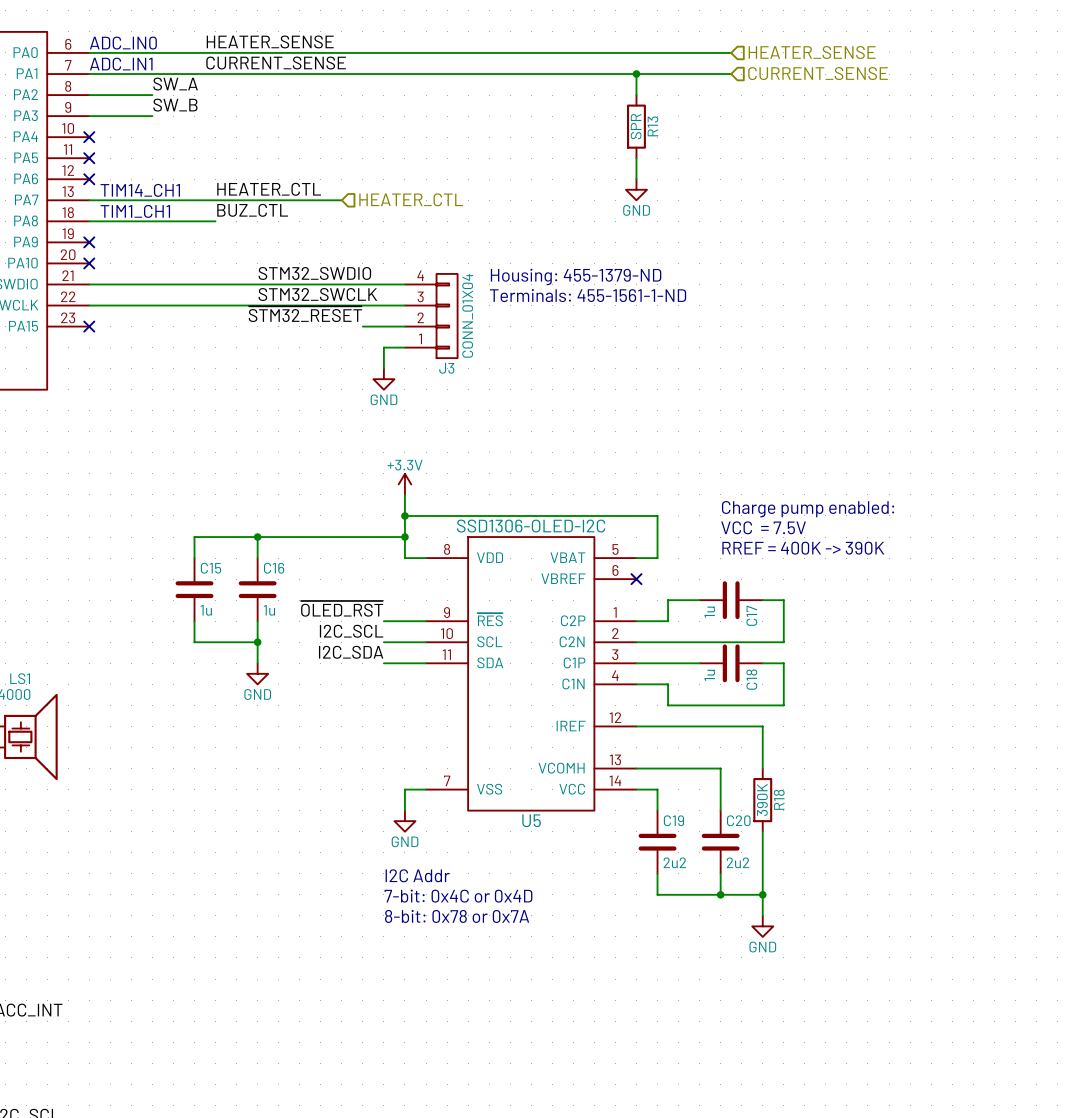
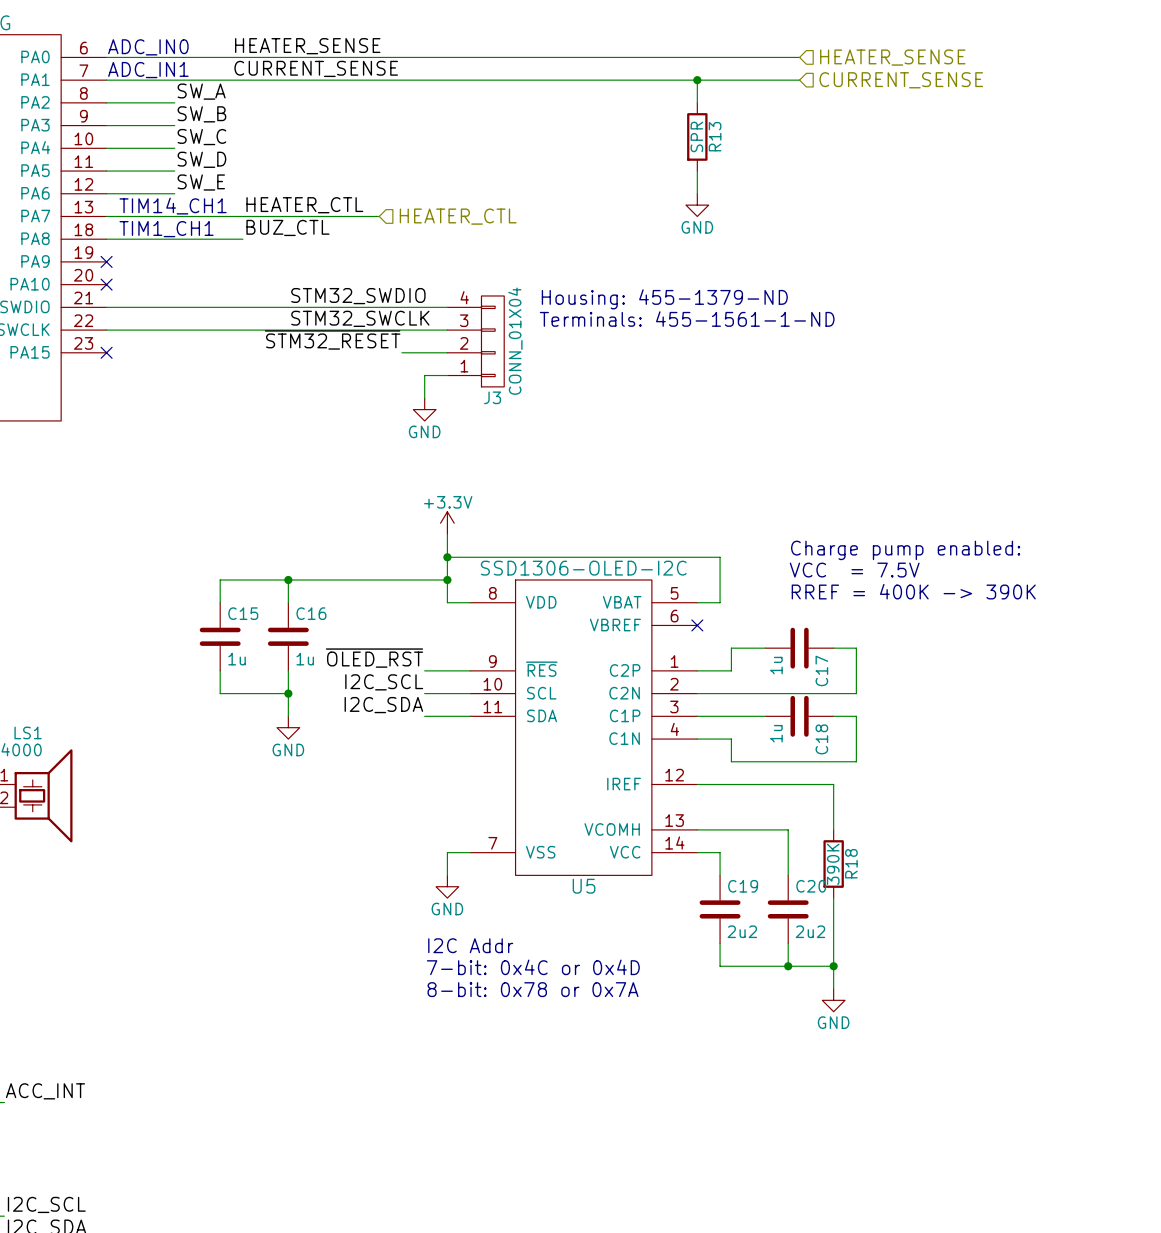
label: none -> SW_C (201, 137)
wire: none -> (106, 148) (174, 148)
no-connect mark: (89, 137) -> none
label: none -> SW_D (201, 159)
wire: none -> (106, 171) (174, 171)
no-connect mark: (89, 158) -> none
label: none -> SW_E (201, 182)
wire: none -> (106, 193) (174, 193)
no-connect mark: (89, 179) -> none

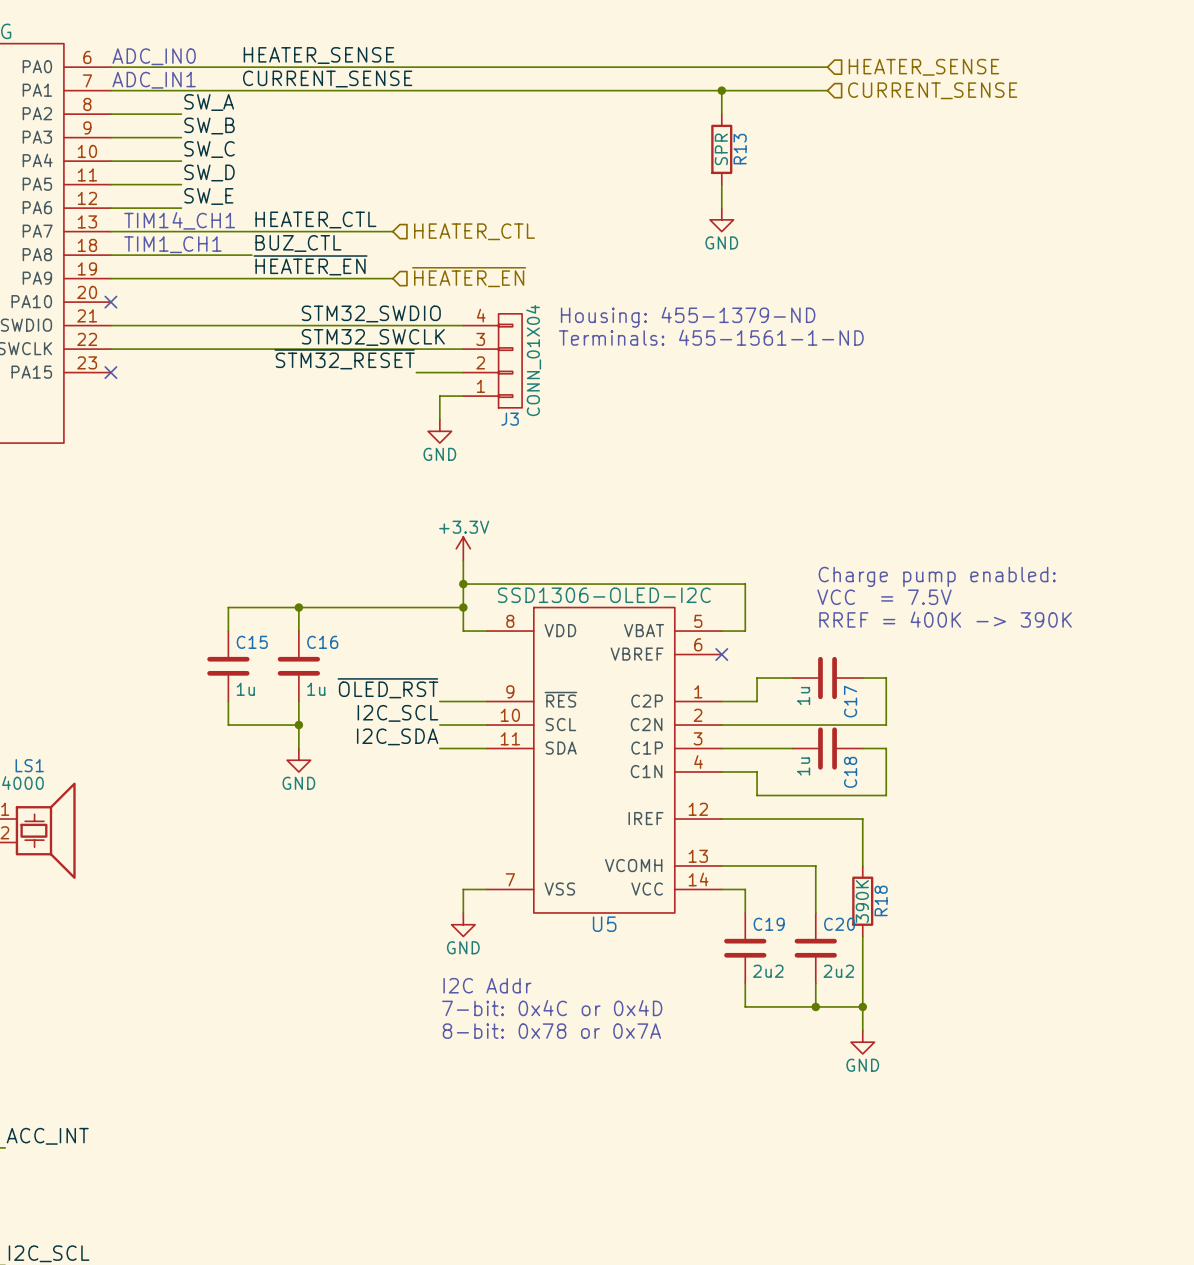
label: none -> ~{HEATER_EN} (310, 265)
hierarchical label: none -> ~{HEATER_EN} (469, 277)
wire: none -> (110, 278) (392, 278)
no-connect mark: (106, 261) -> none

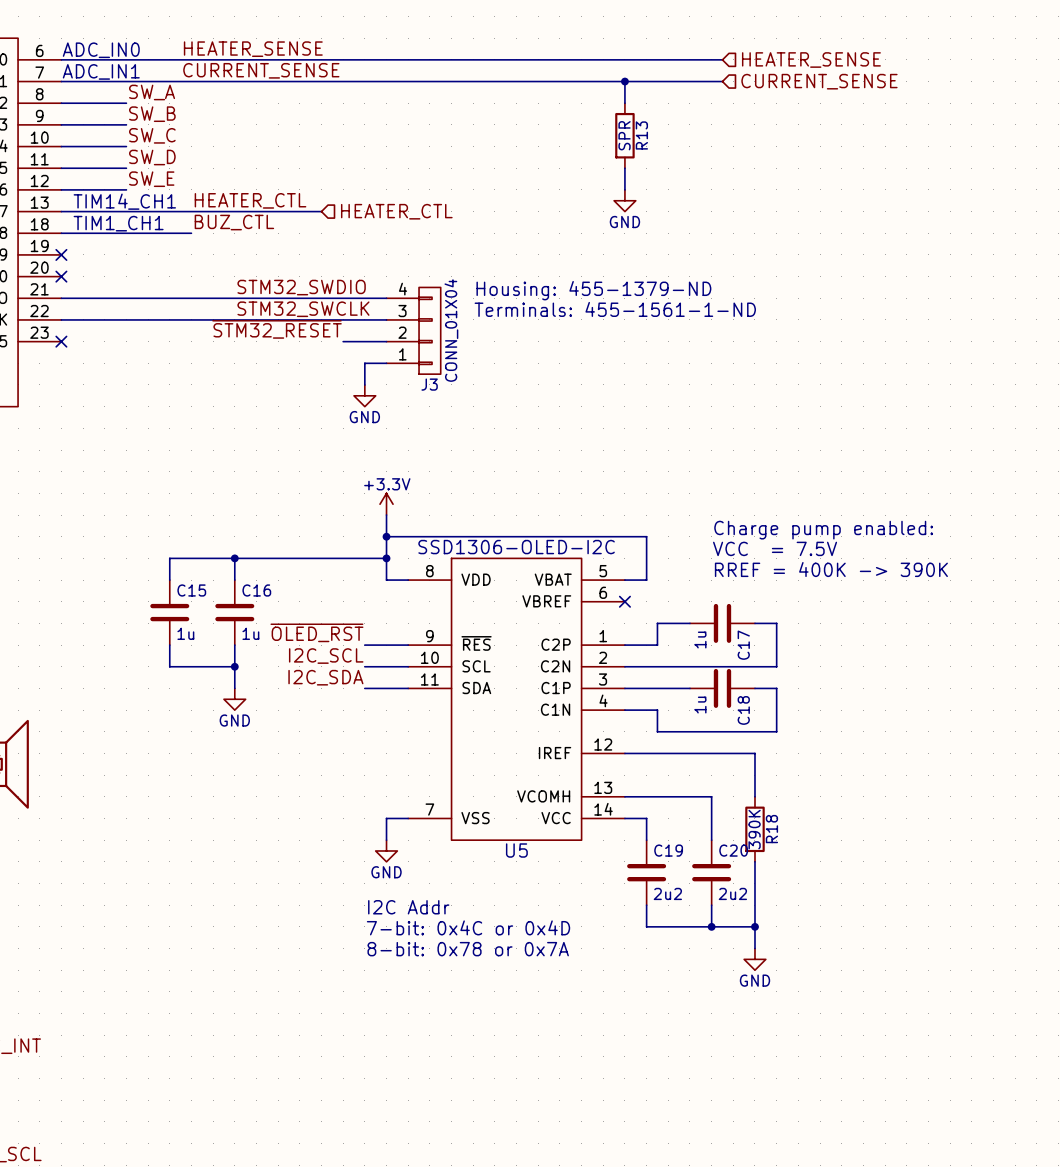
label: ~{HEATER_EN} (310, 265) -> none
hierarchical label: ~{HEATER_EN} (469, 277) -> none
wire: (110, 278) (392, 278) -> none
no-connect mark: none -> (61, 254)

